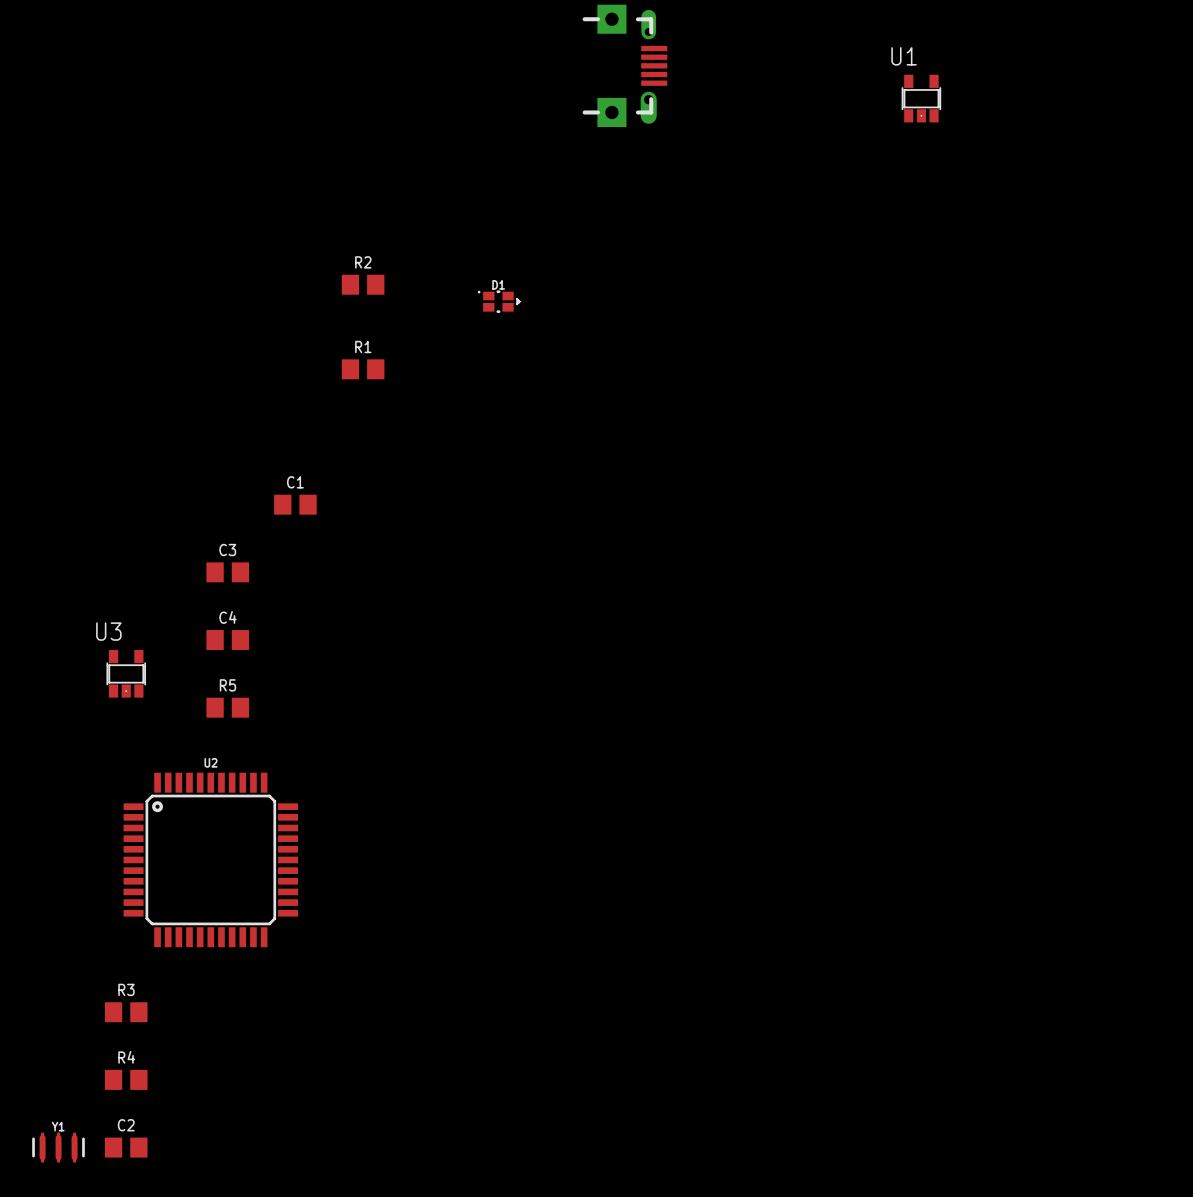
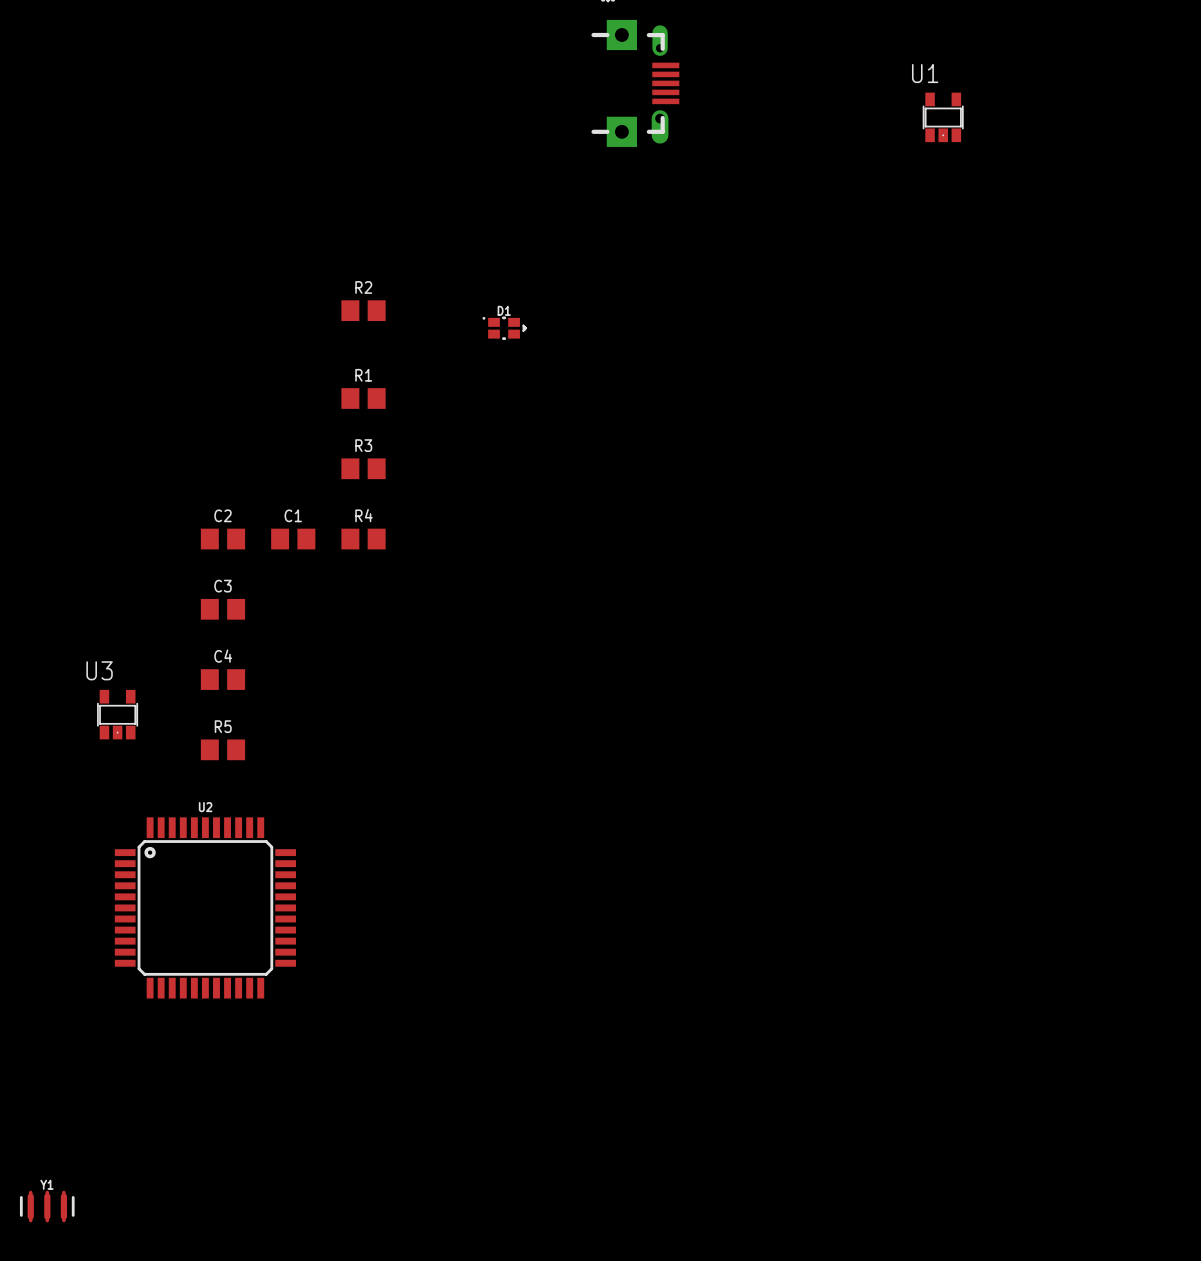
R3 position: (126, 1012) -> (363, 468)
R4 position: (126, 1079) -> (363, 539)
C2 position: (126, 1147) -> (222, 539)

